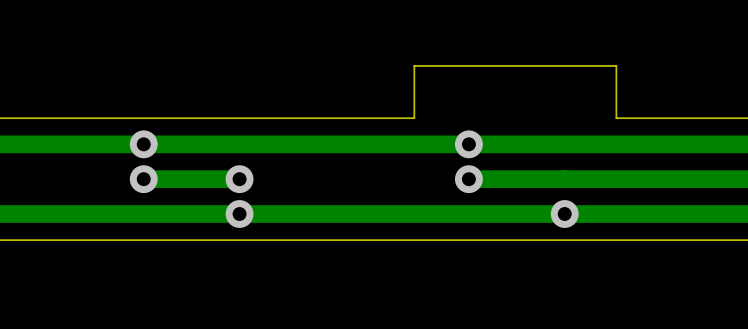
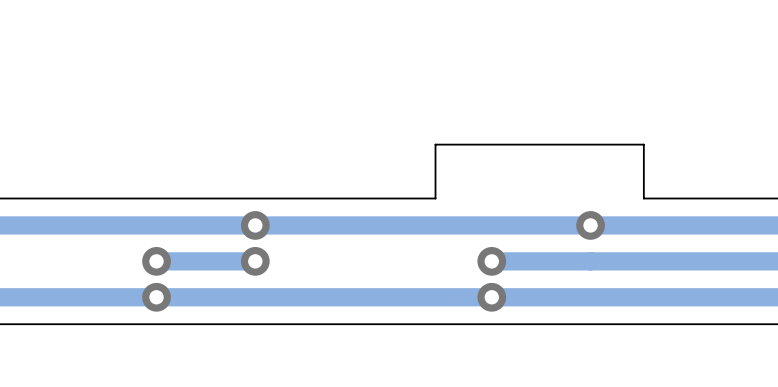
via: (143, 144) -> none
via: none -> (255, 225)
via: (468, 144) -> none
via: none -> (590, 225)
via: none -> (156, 297)
via: (239, 214) -> none
via: none -> (491, 297)
via: (564, 214) -> none

